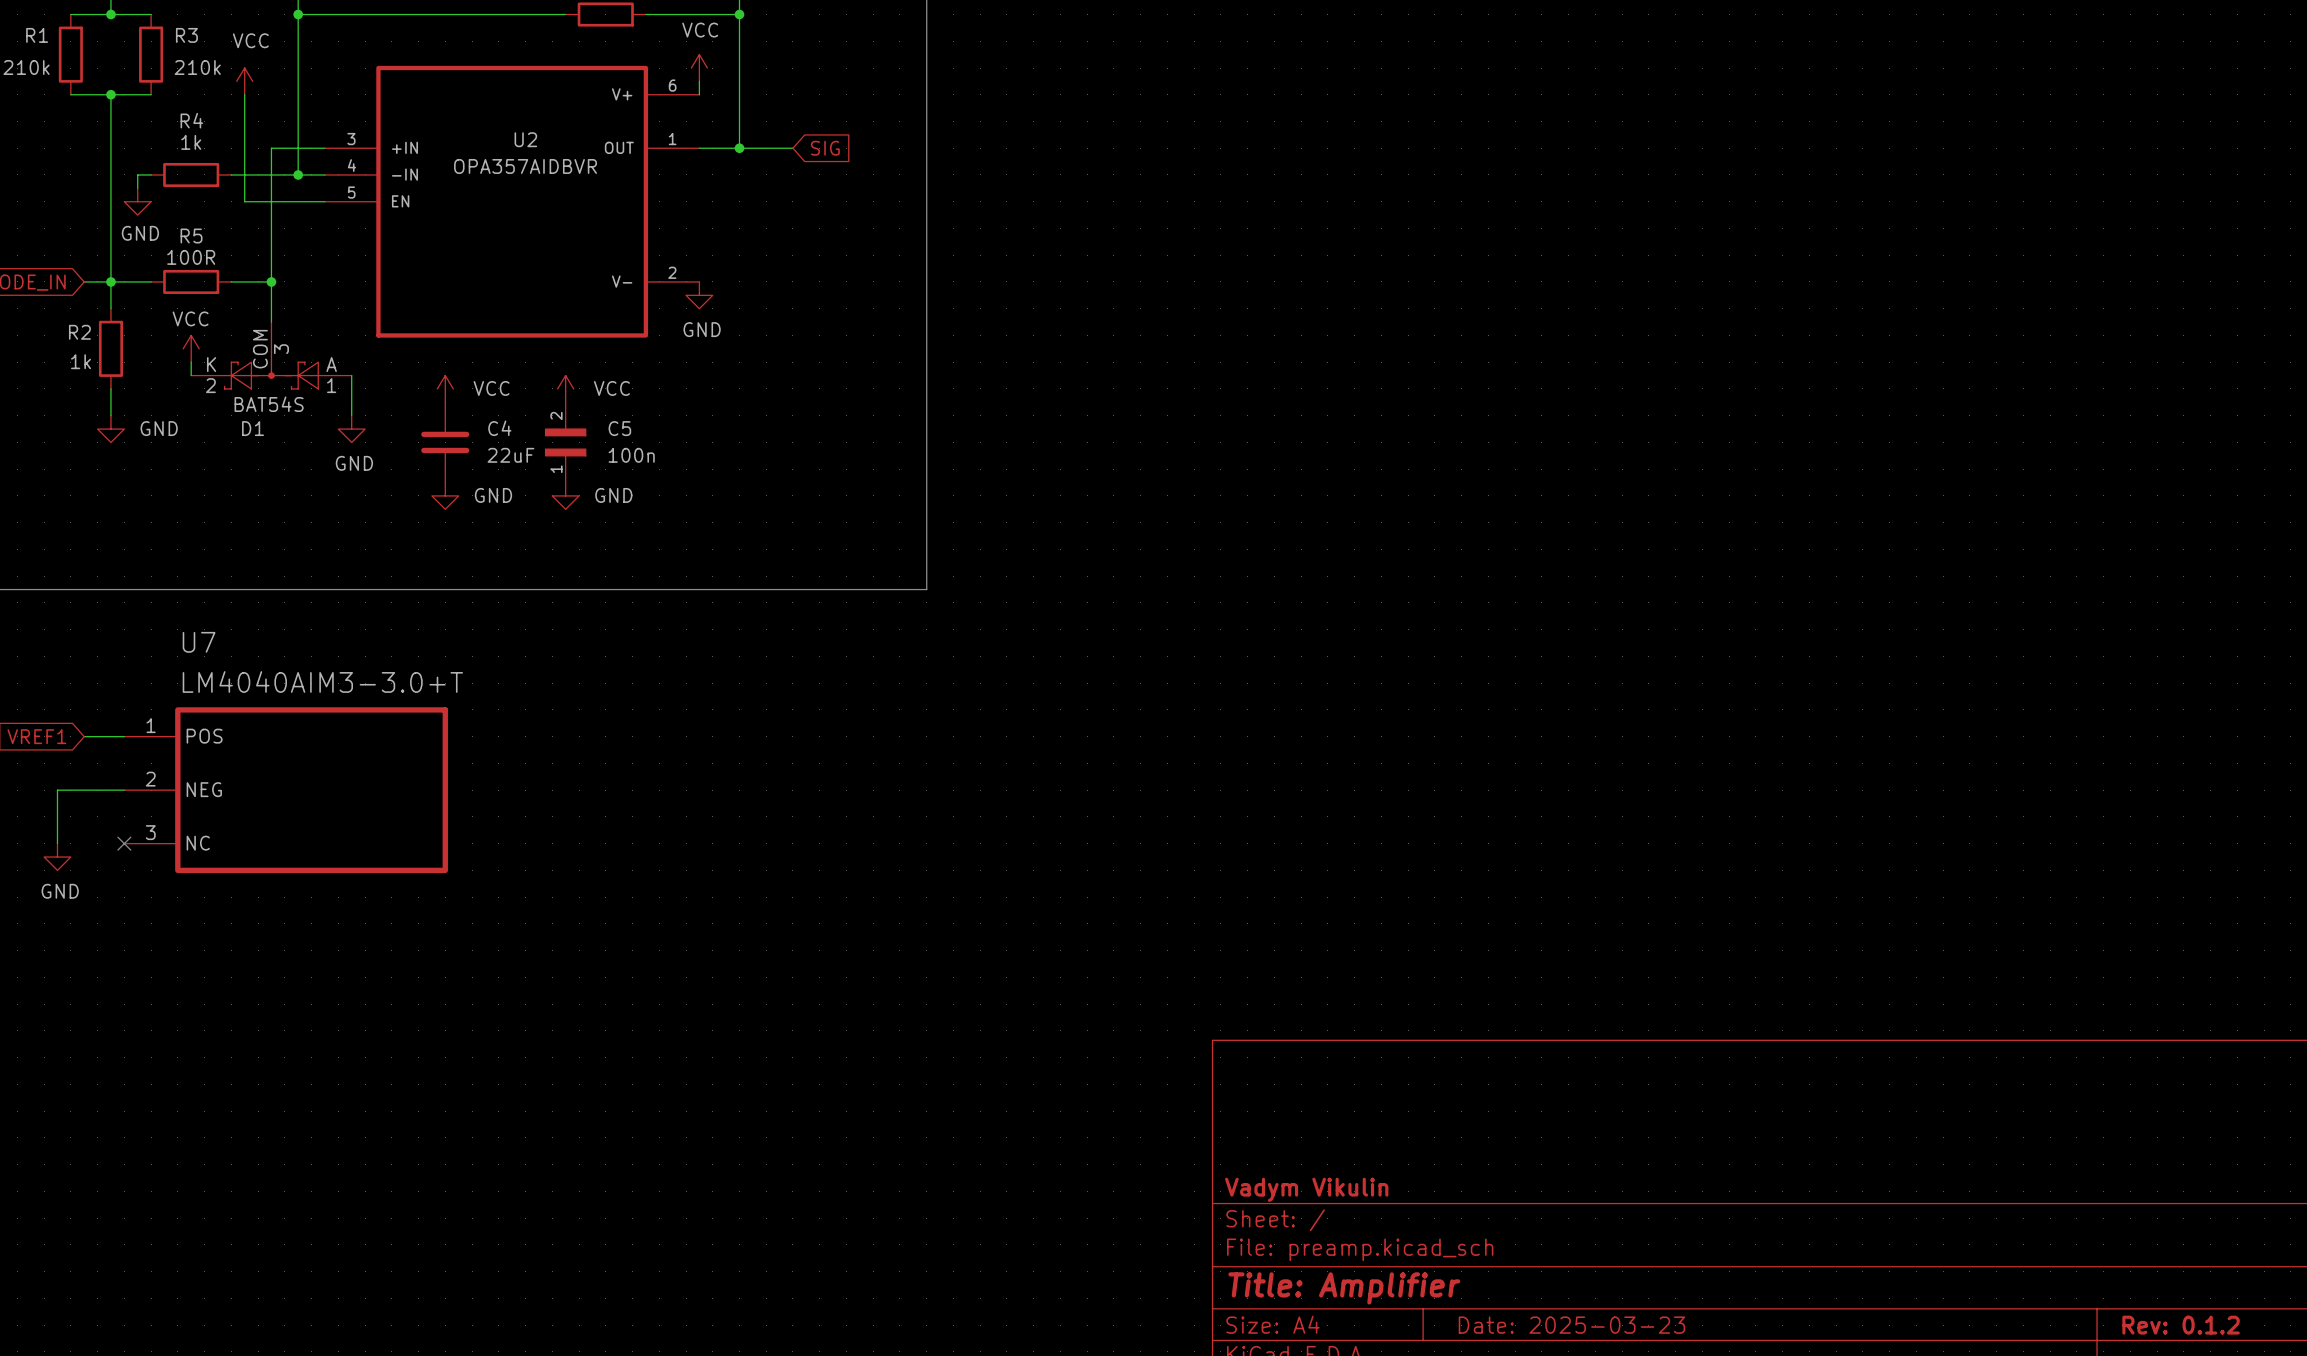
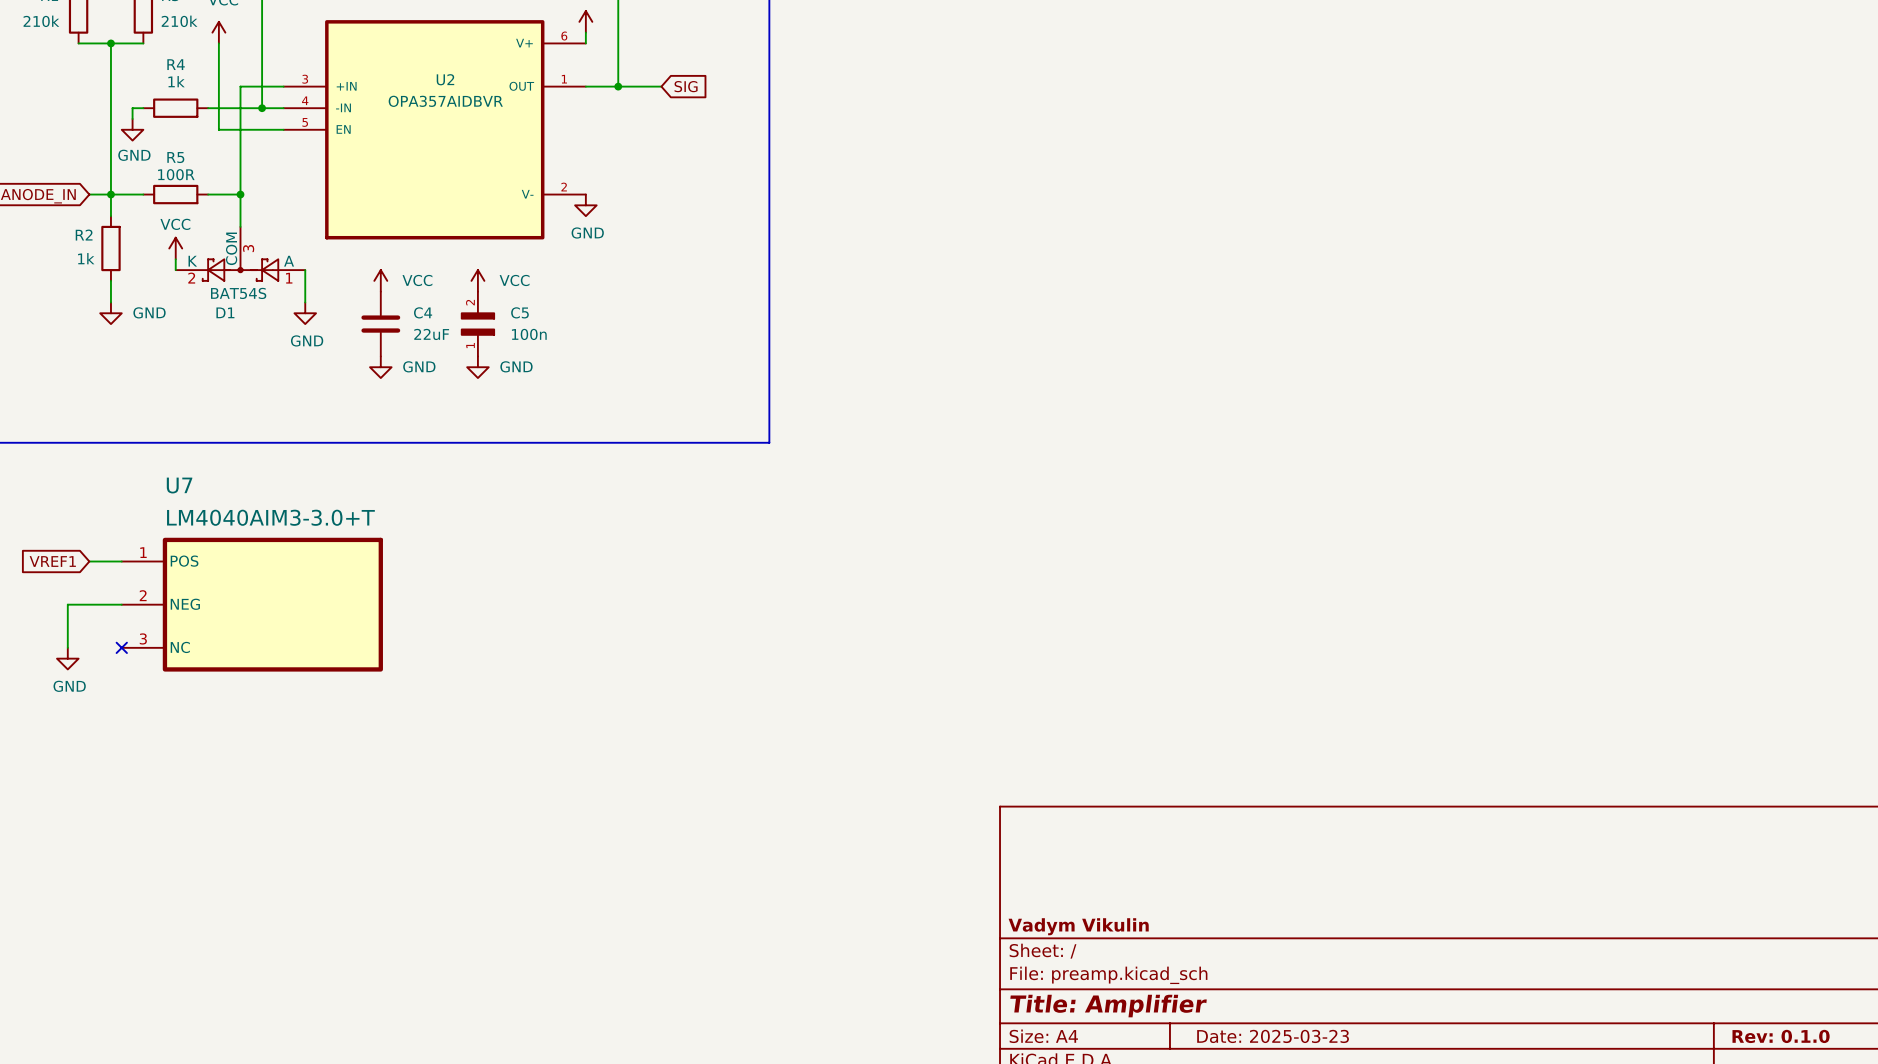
title block: Rev: 0.1.2 (2181, 1325) -> Rev: 0.1.0 (1781, 1036)

